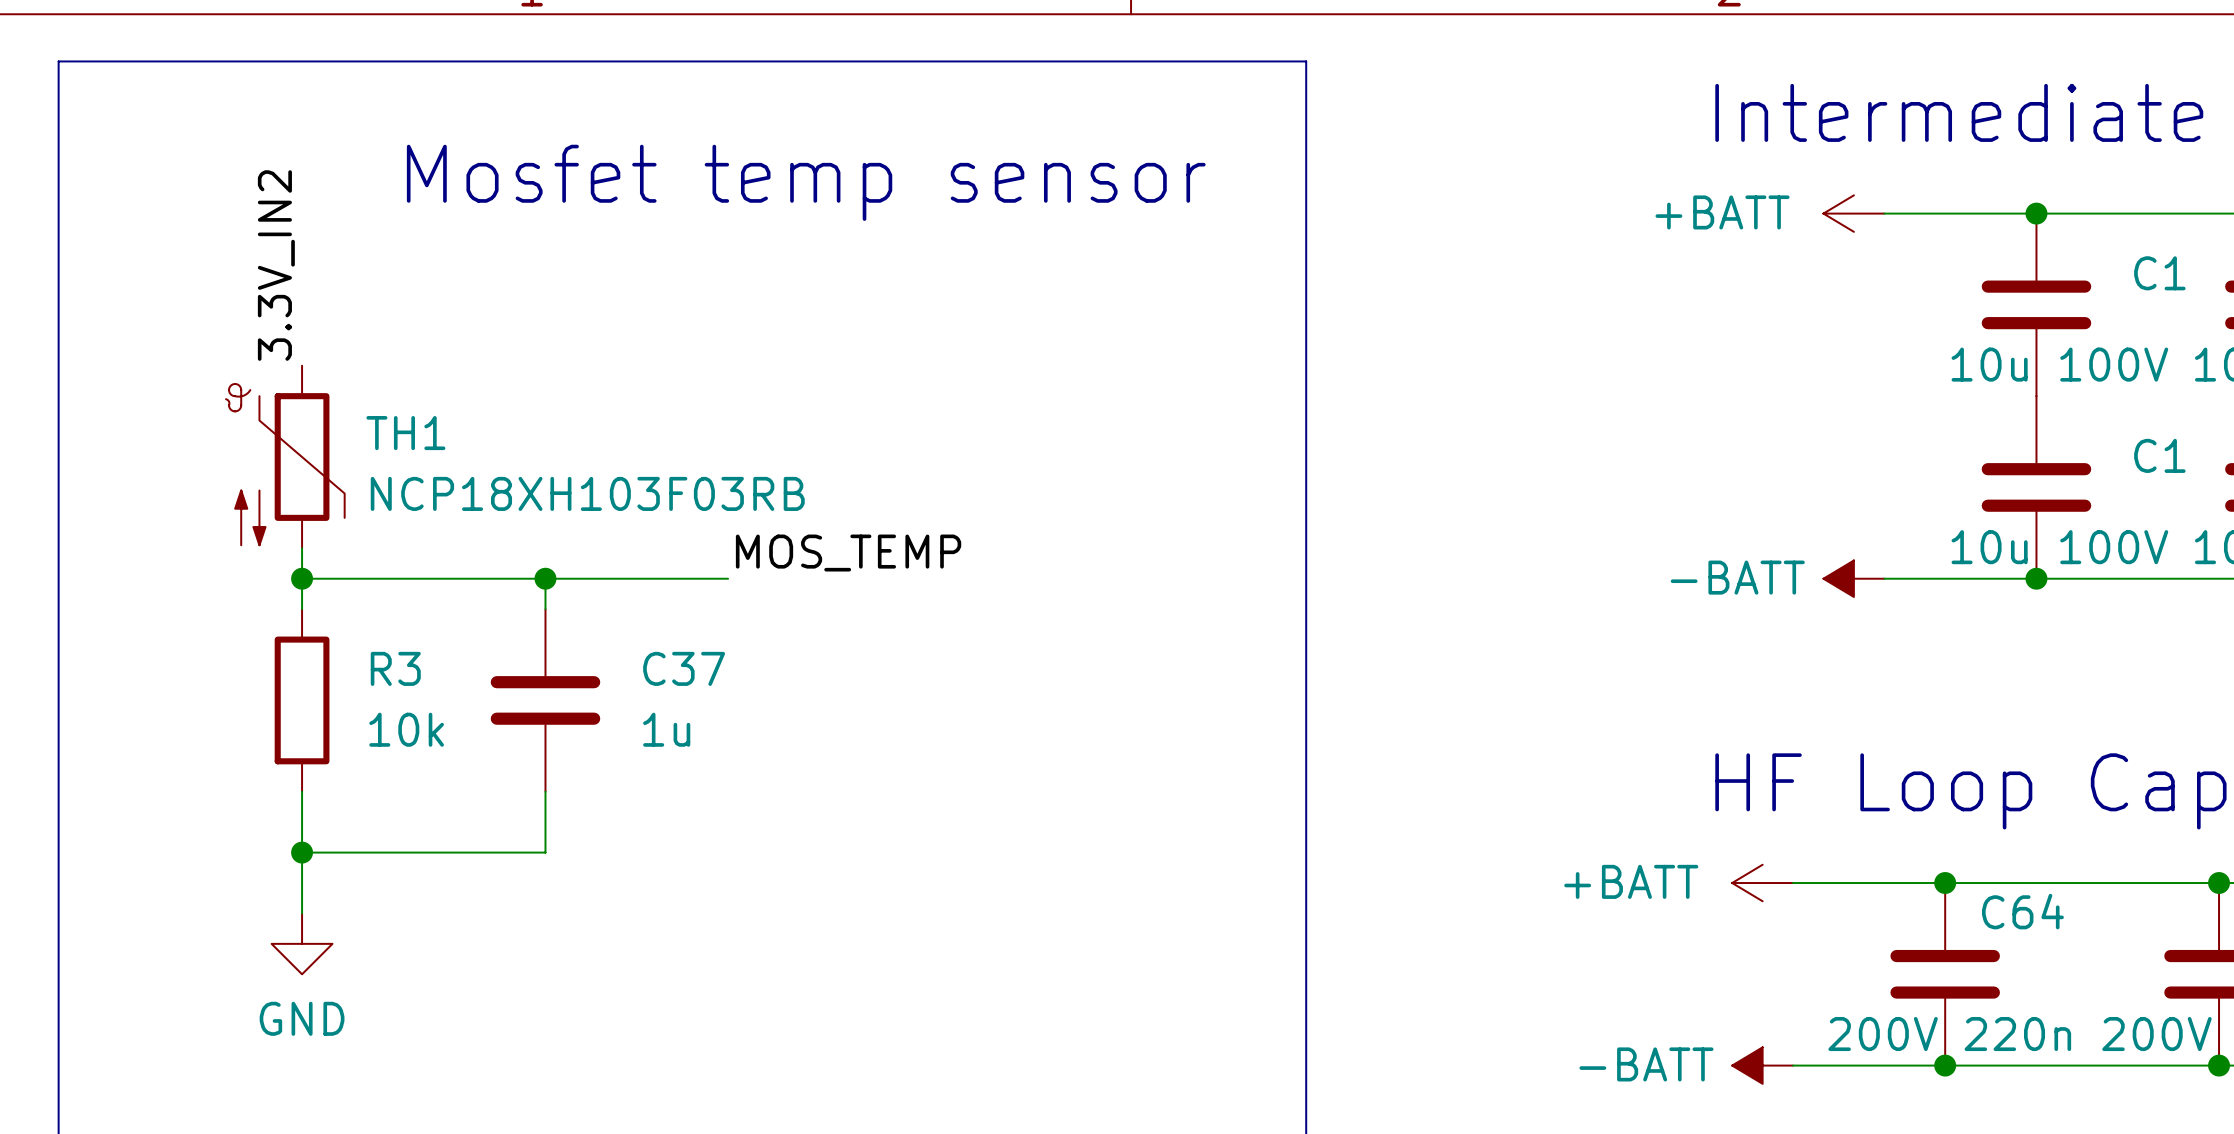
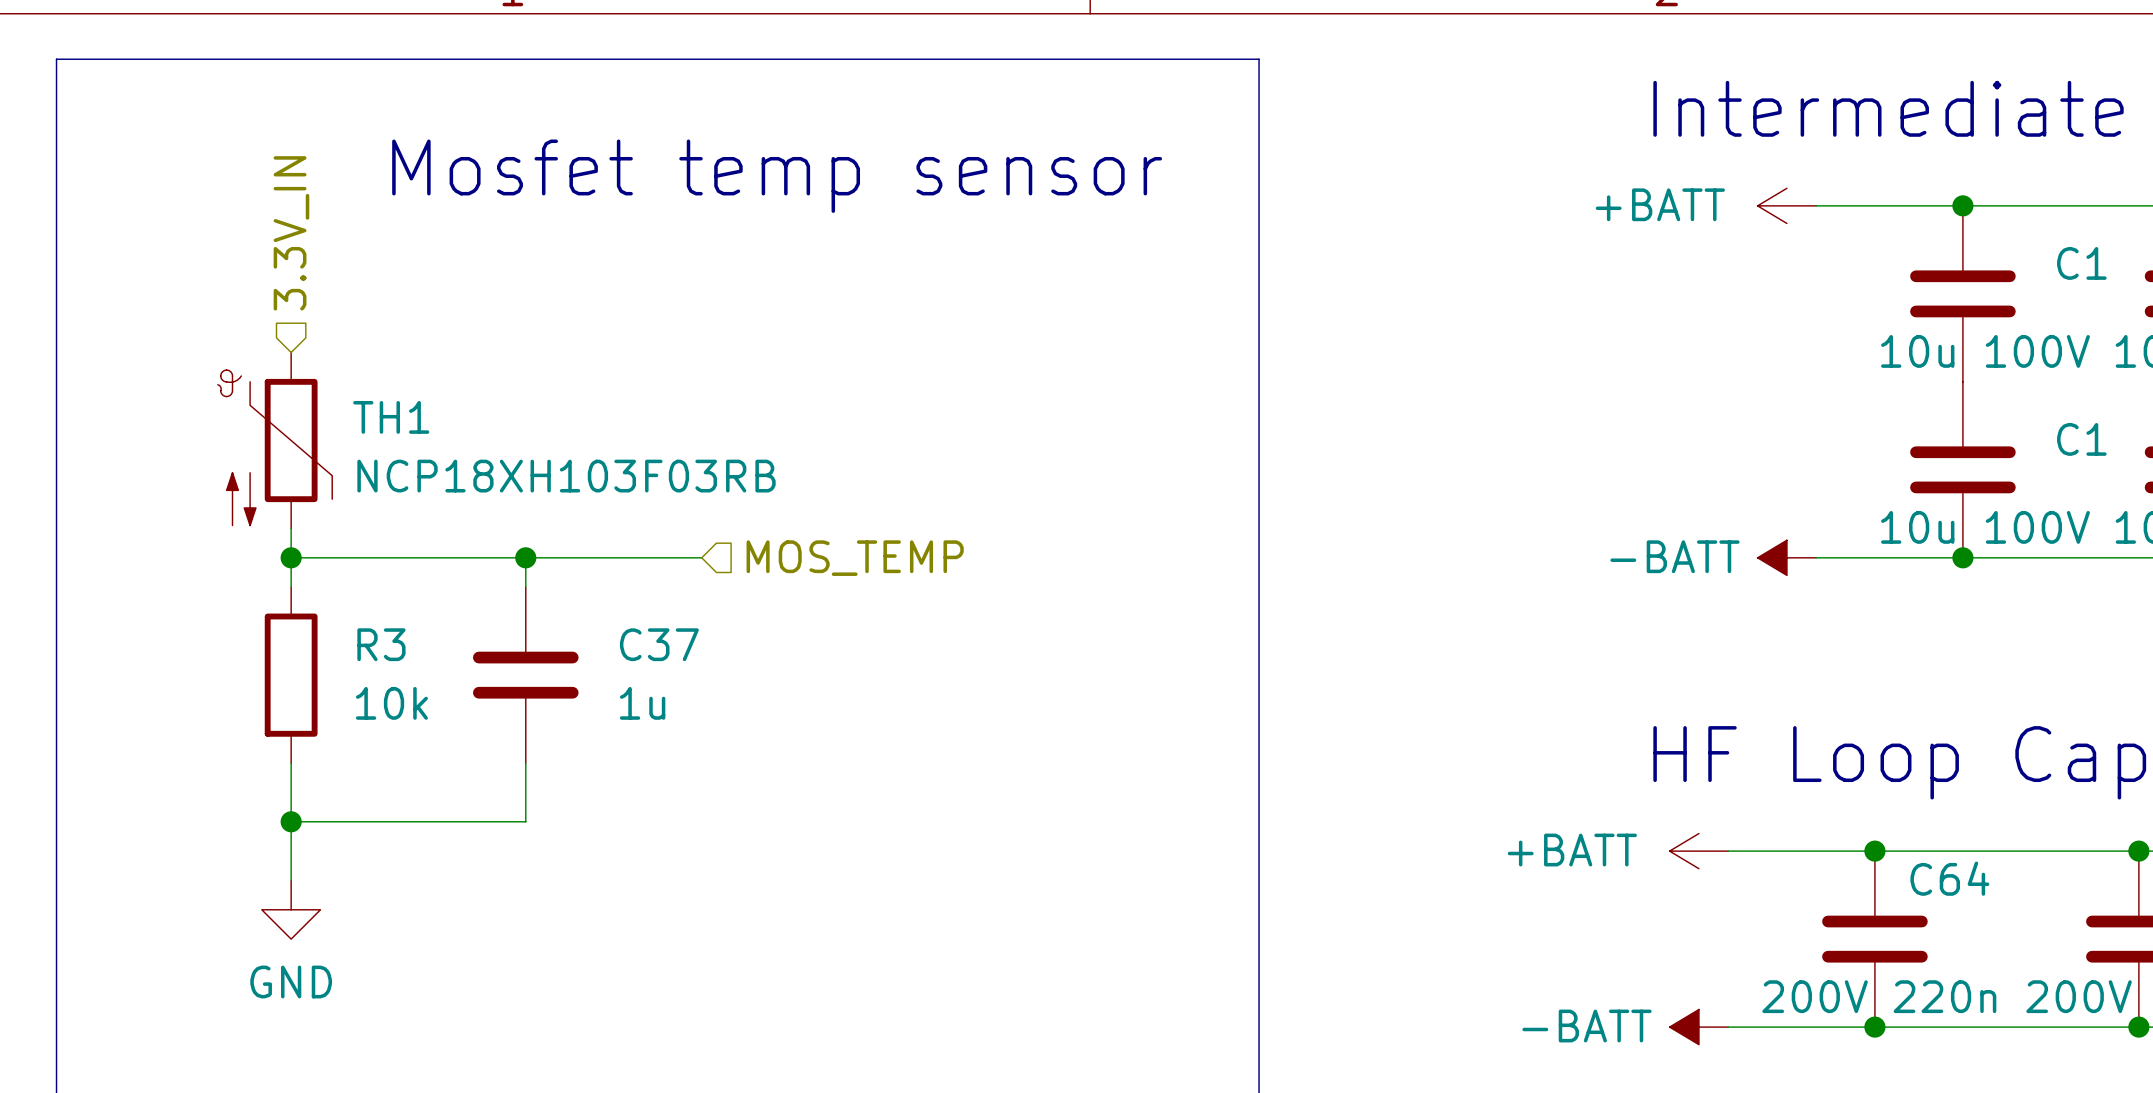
hierarchical label: none -> 3.3V_IN (291, 233)
label: 3.3V_IN2 (276, 265) -> none
label: MOS_TEMP (848, 553) -> none
hierarchical label: none -> MOS_TEMP (855, 558)

